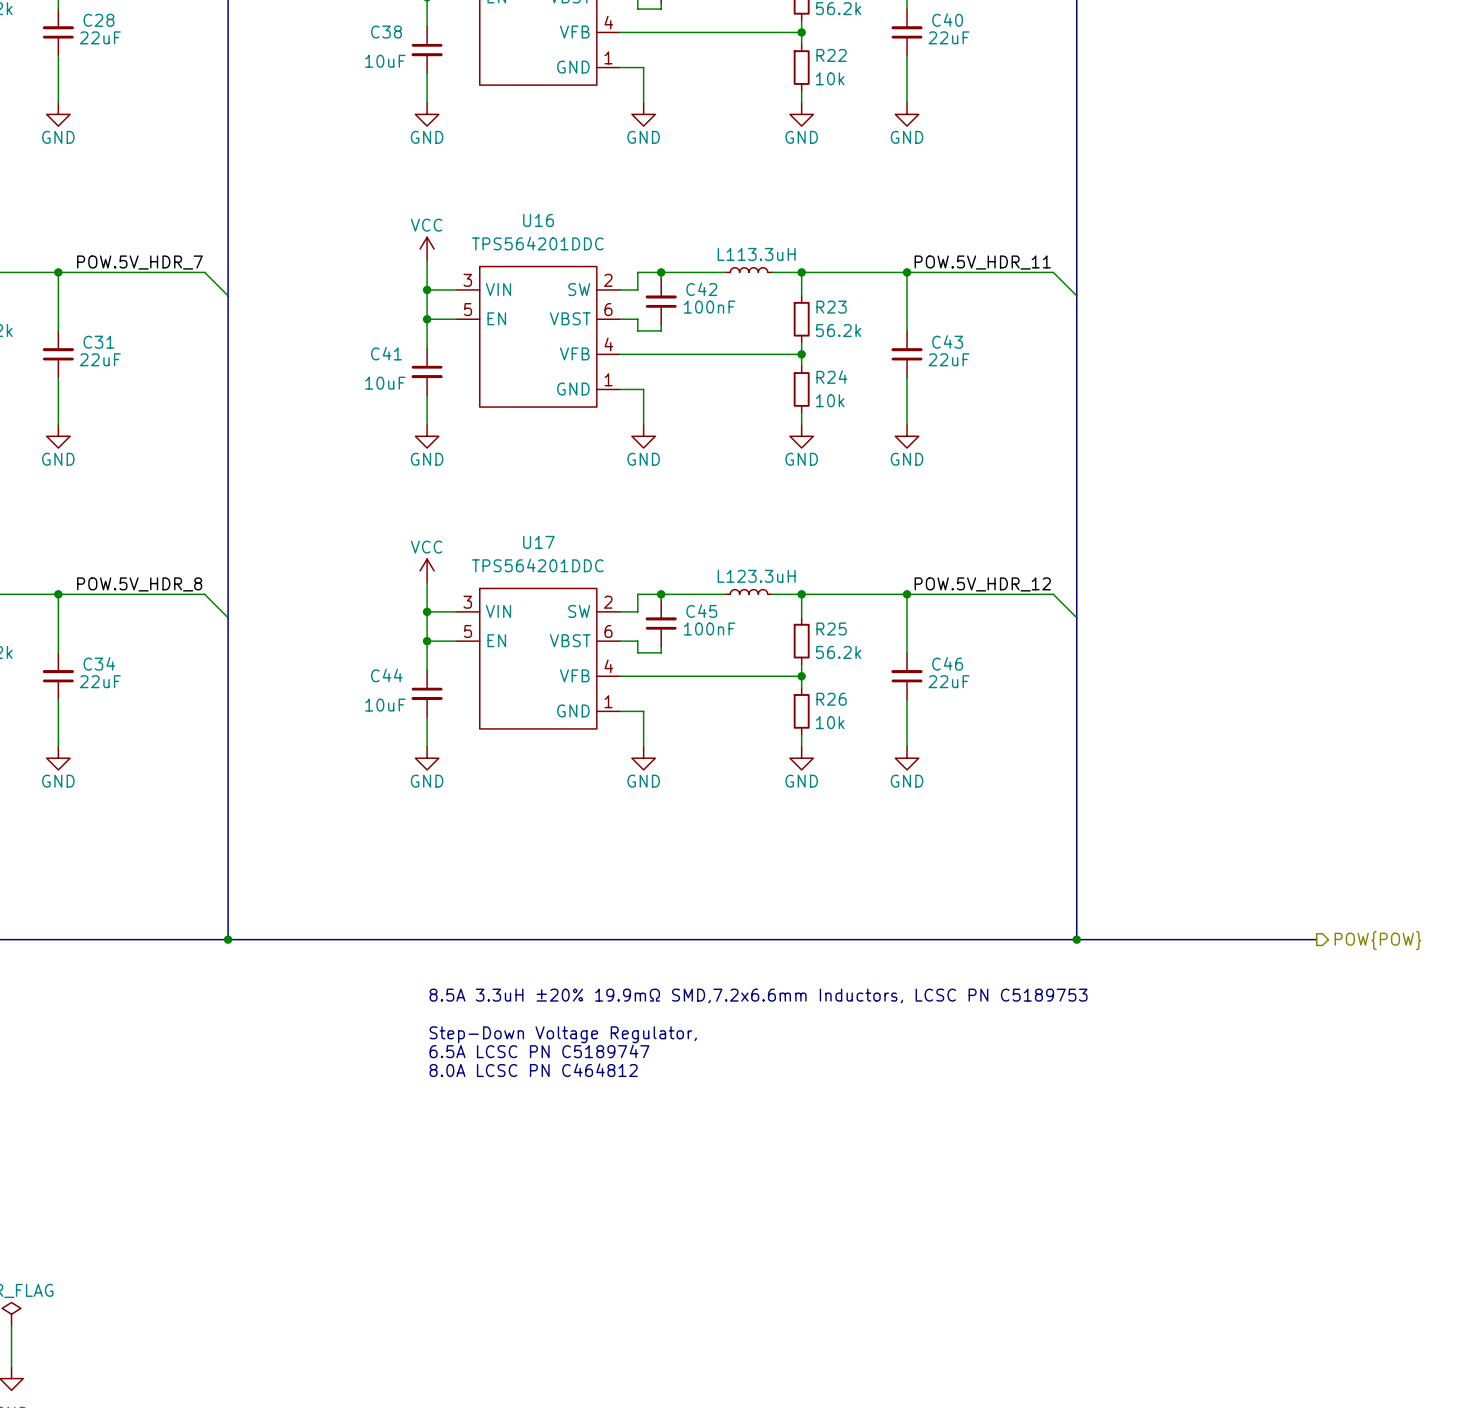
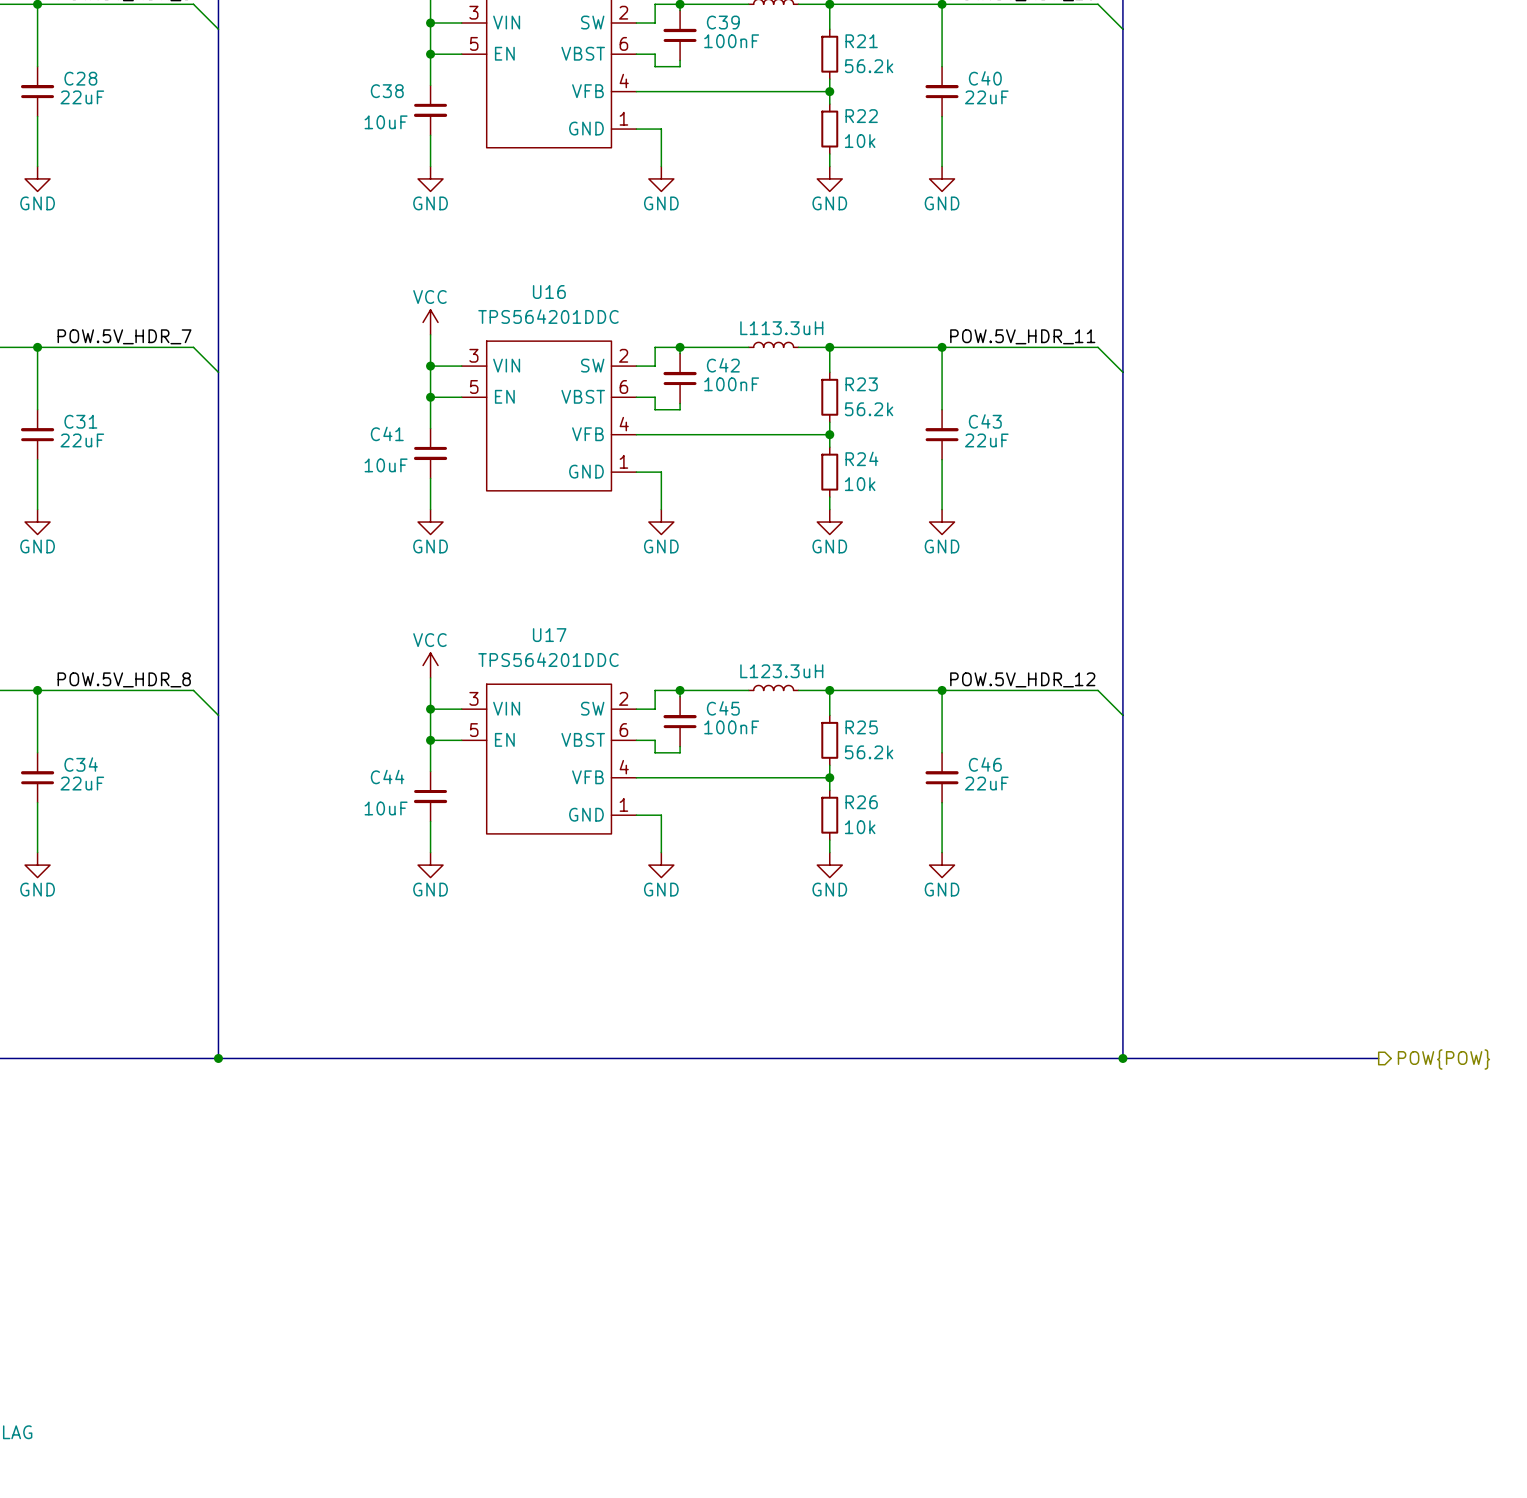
text: 8.5A 3.3uH ±20% 19.9mΩ SMD,7.2x6.6mm Inductors, LCSC PN C5189753 (758, 995) -> none
text: Step-Down Voltage Regulator, (563, 1034) -> none
text: 6.5A LCSC PN C5189747 (539, 1051) -> none
text: 8.0A LCSC PN C464812 (533, 1070) -> none

